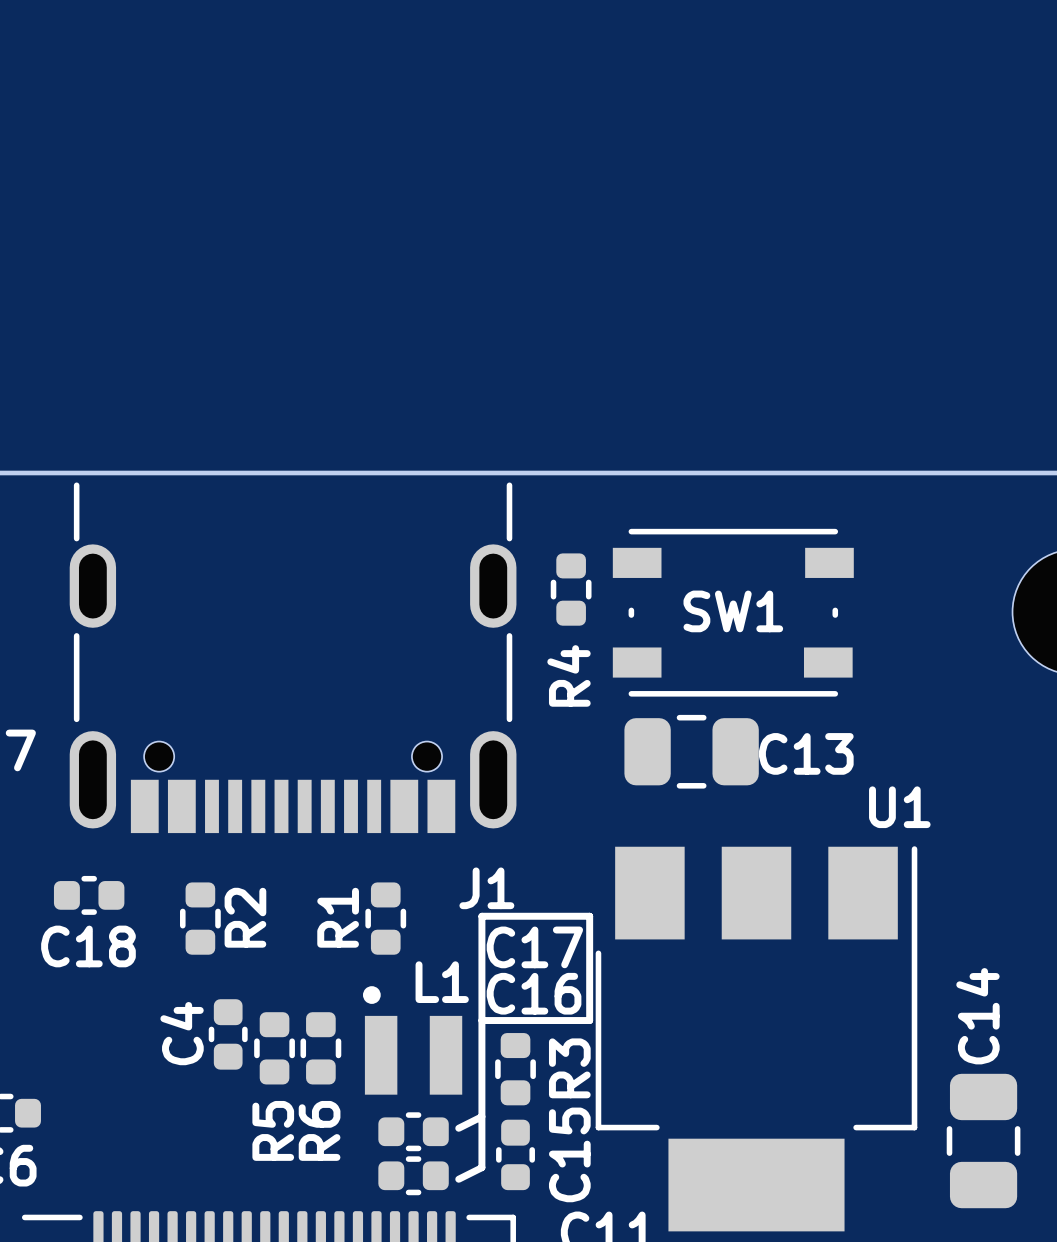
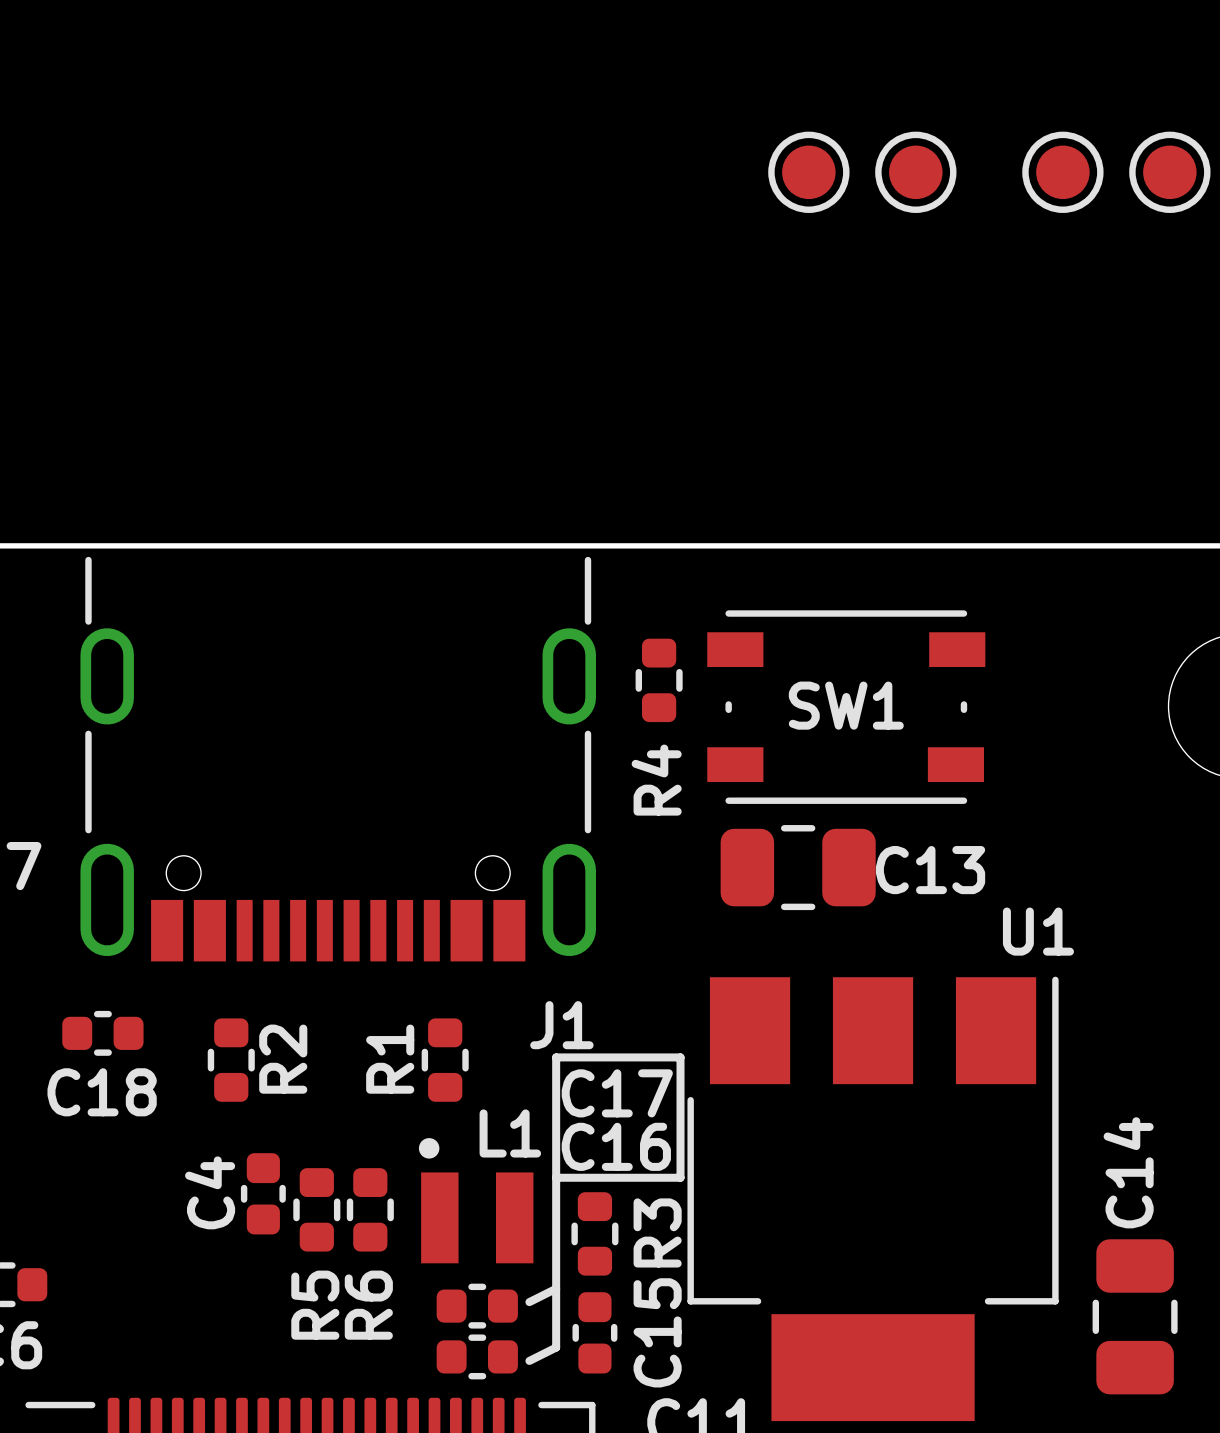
part: none -> (808, 172)
part: none -> (915, 172)
part: none -> (1062, 172)
part: none -> (1169, 172)

